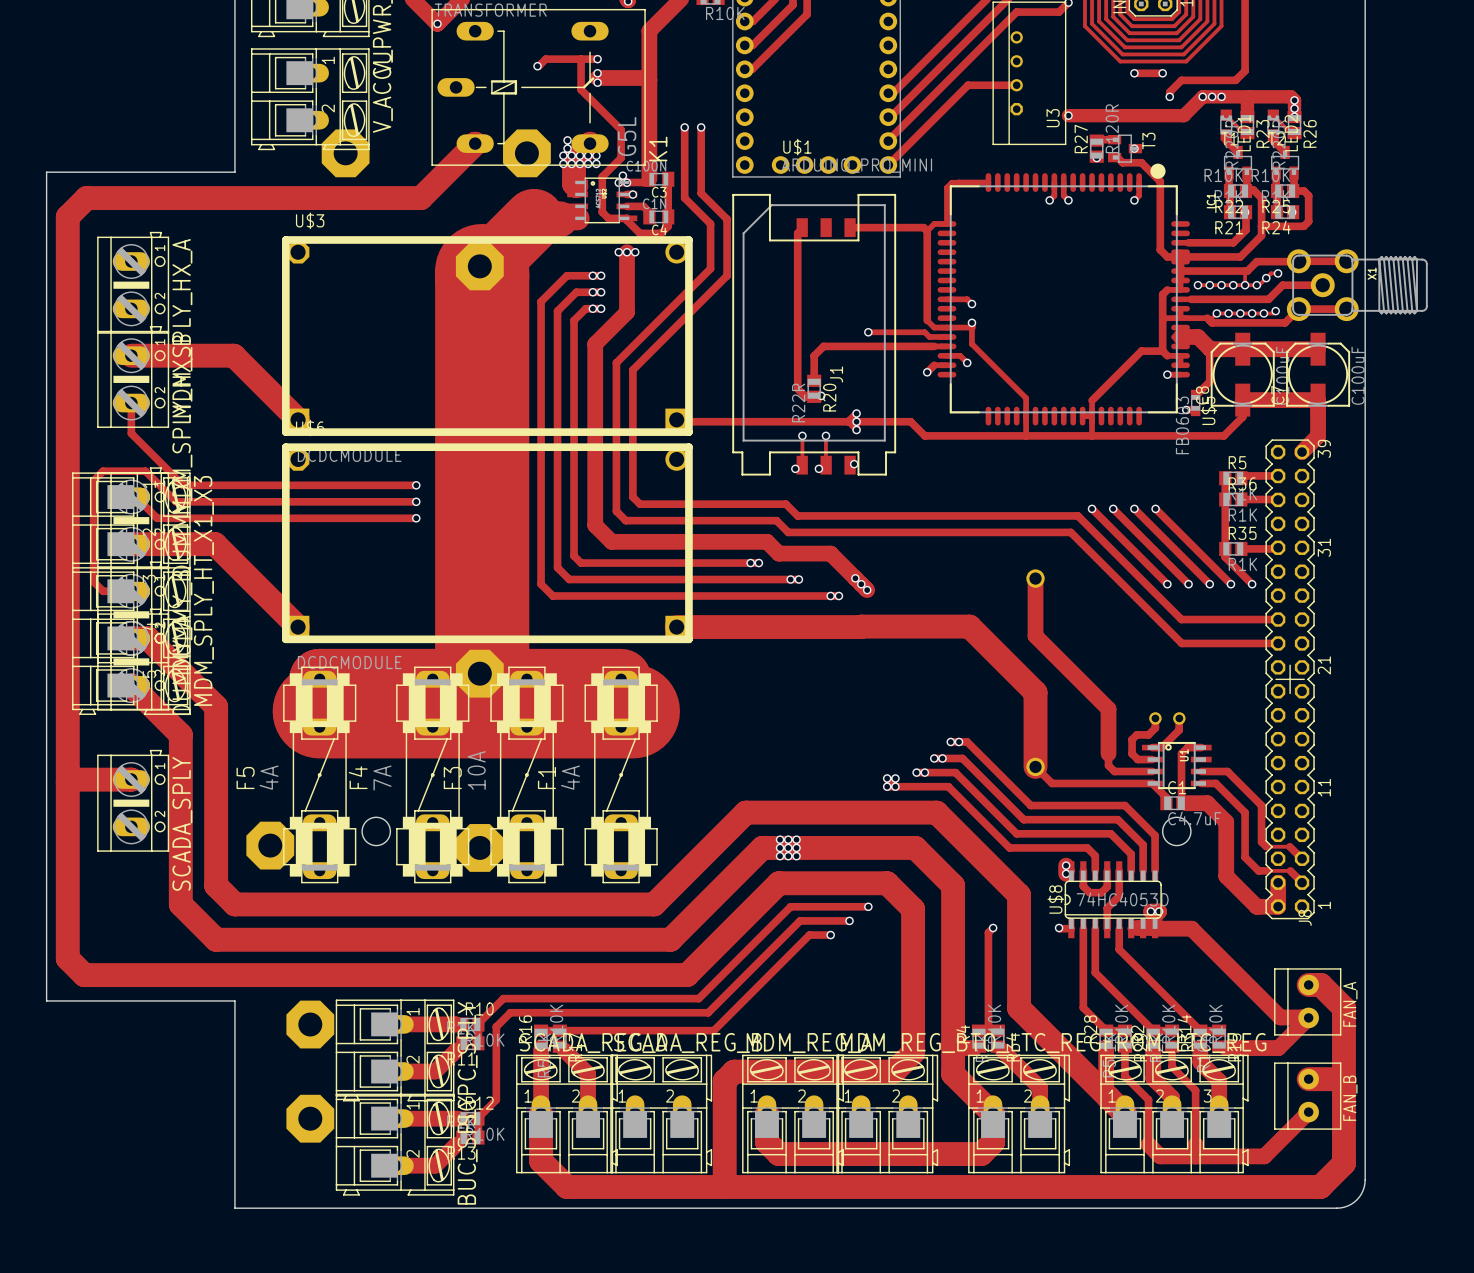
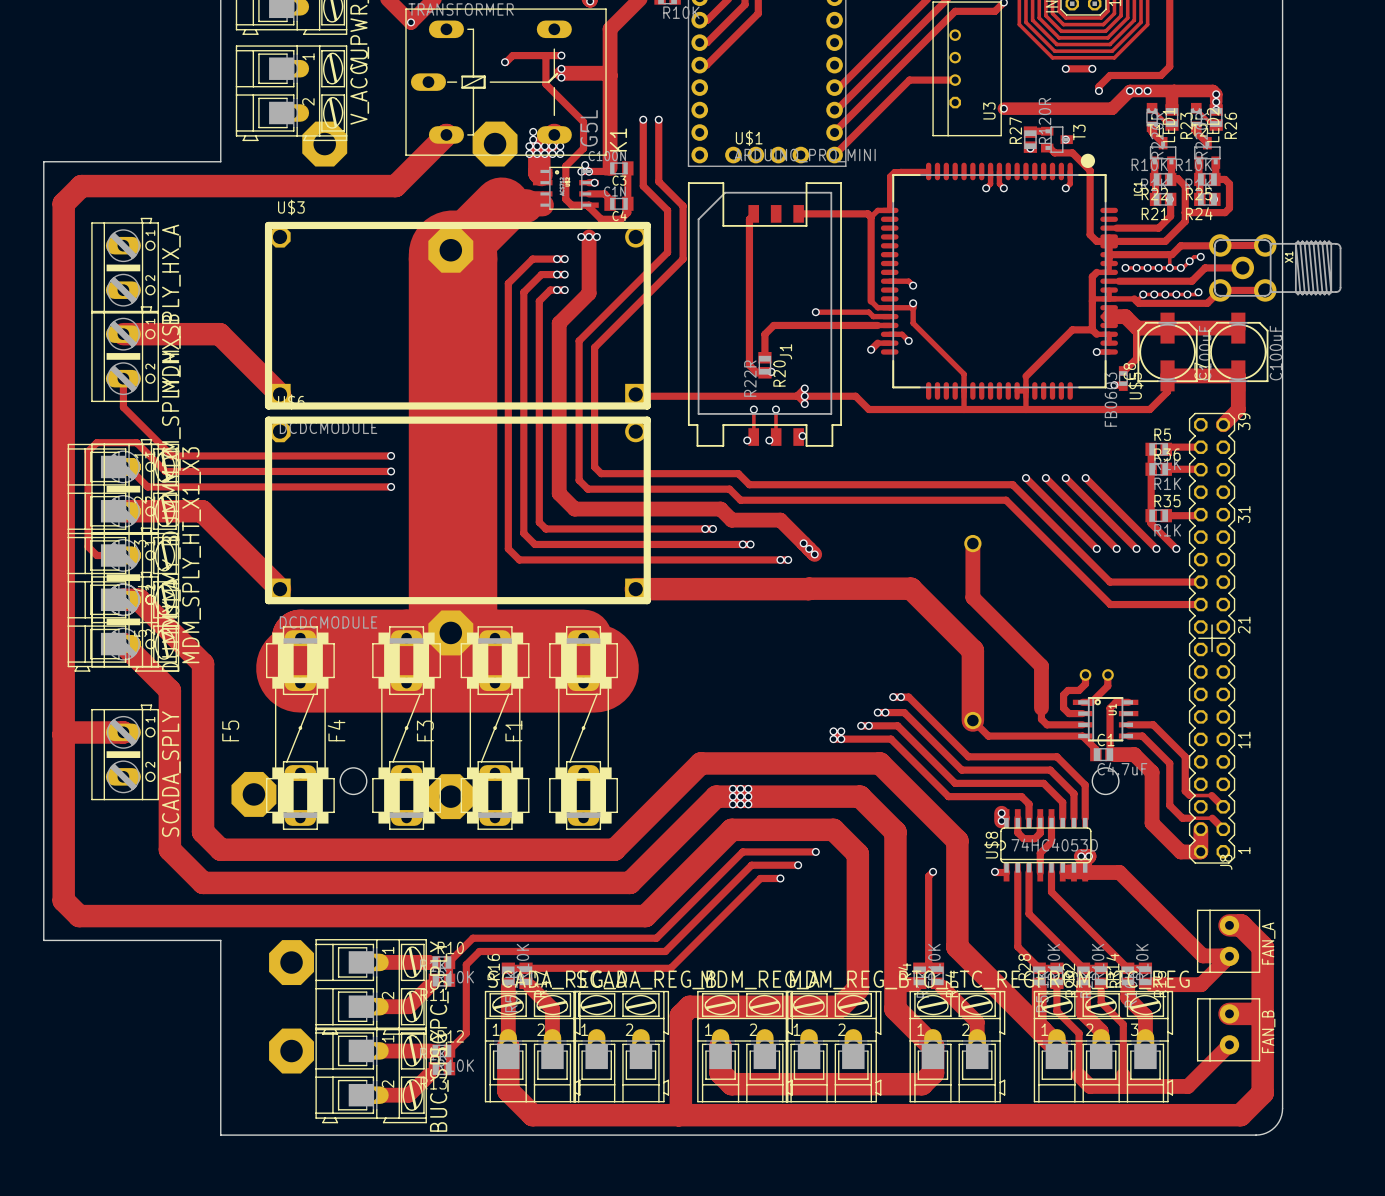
F3 value: 10A (476, 770) -> none
F5 value: 4A (269, 777) -> none
F1 value: 4A (570, 777) -> none
F4 value: 7A (382, 778) -> none

